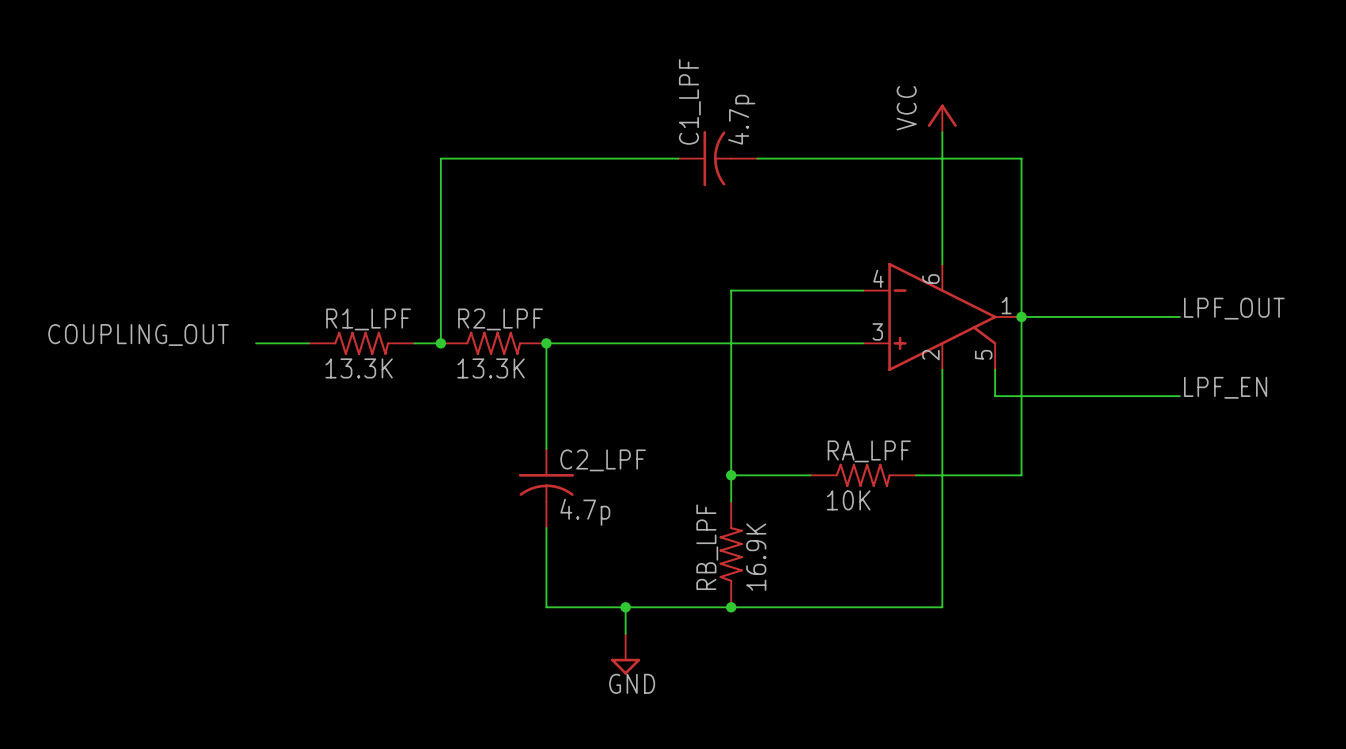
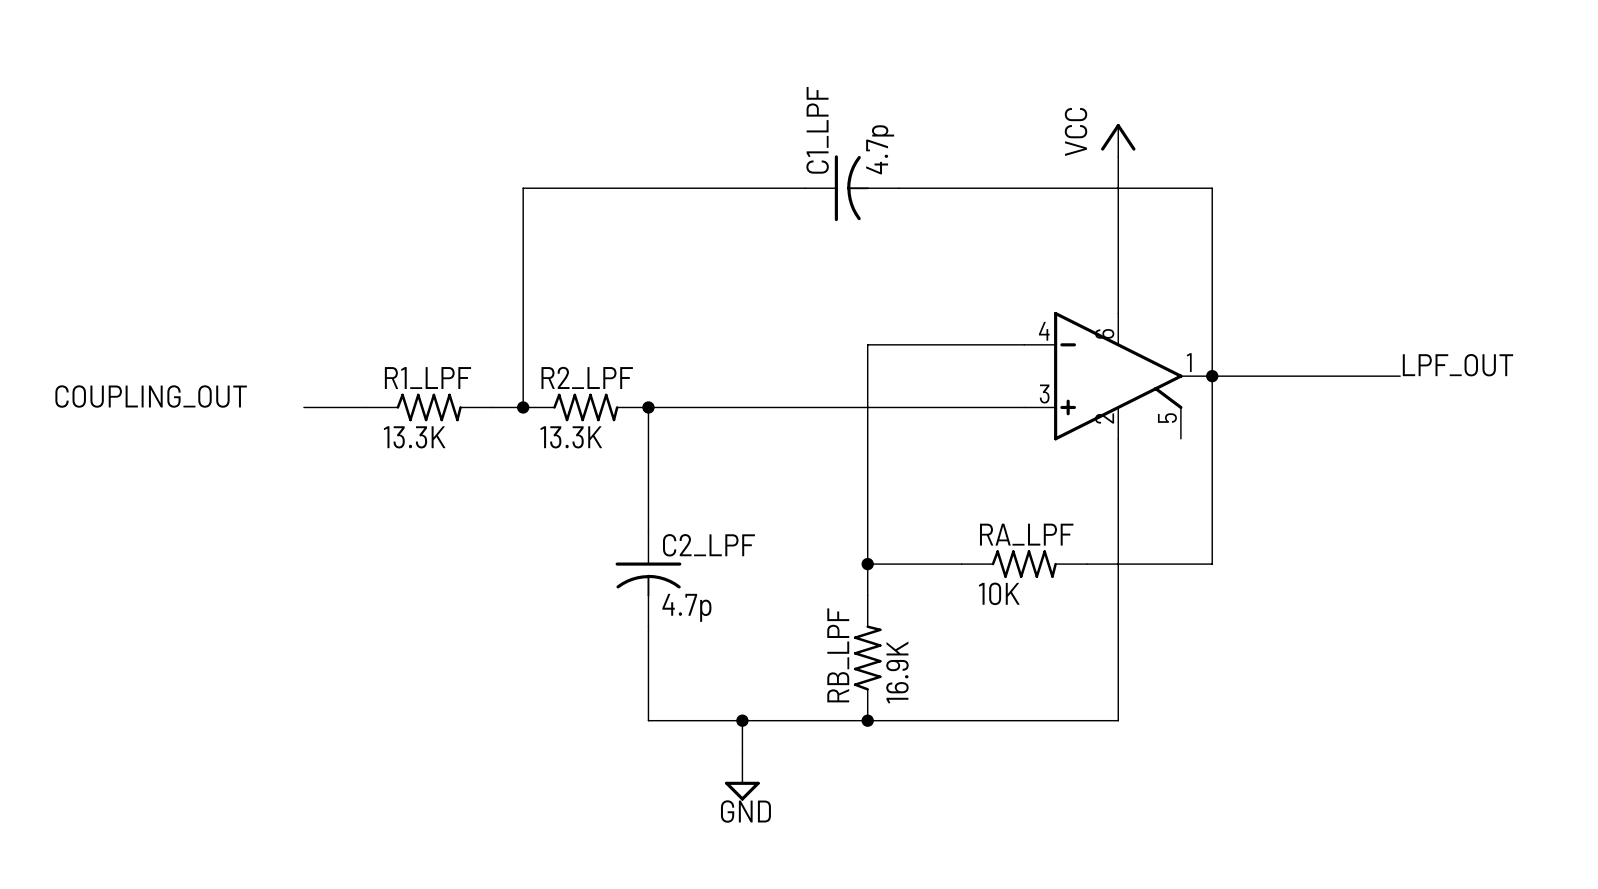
wire: (995, 369) (995, 396) (1179, 396) -> none
label: LPF_EN (1225, 387) -> none

